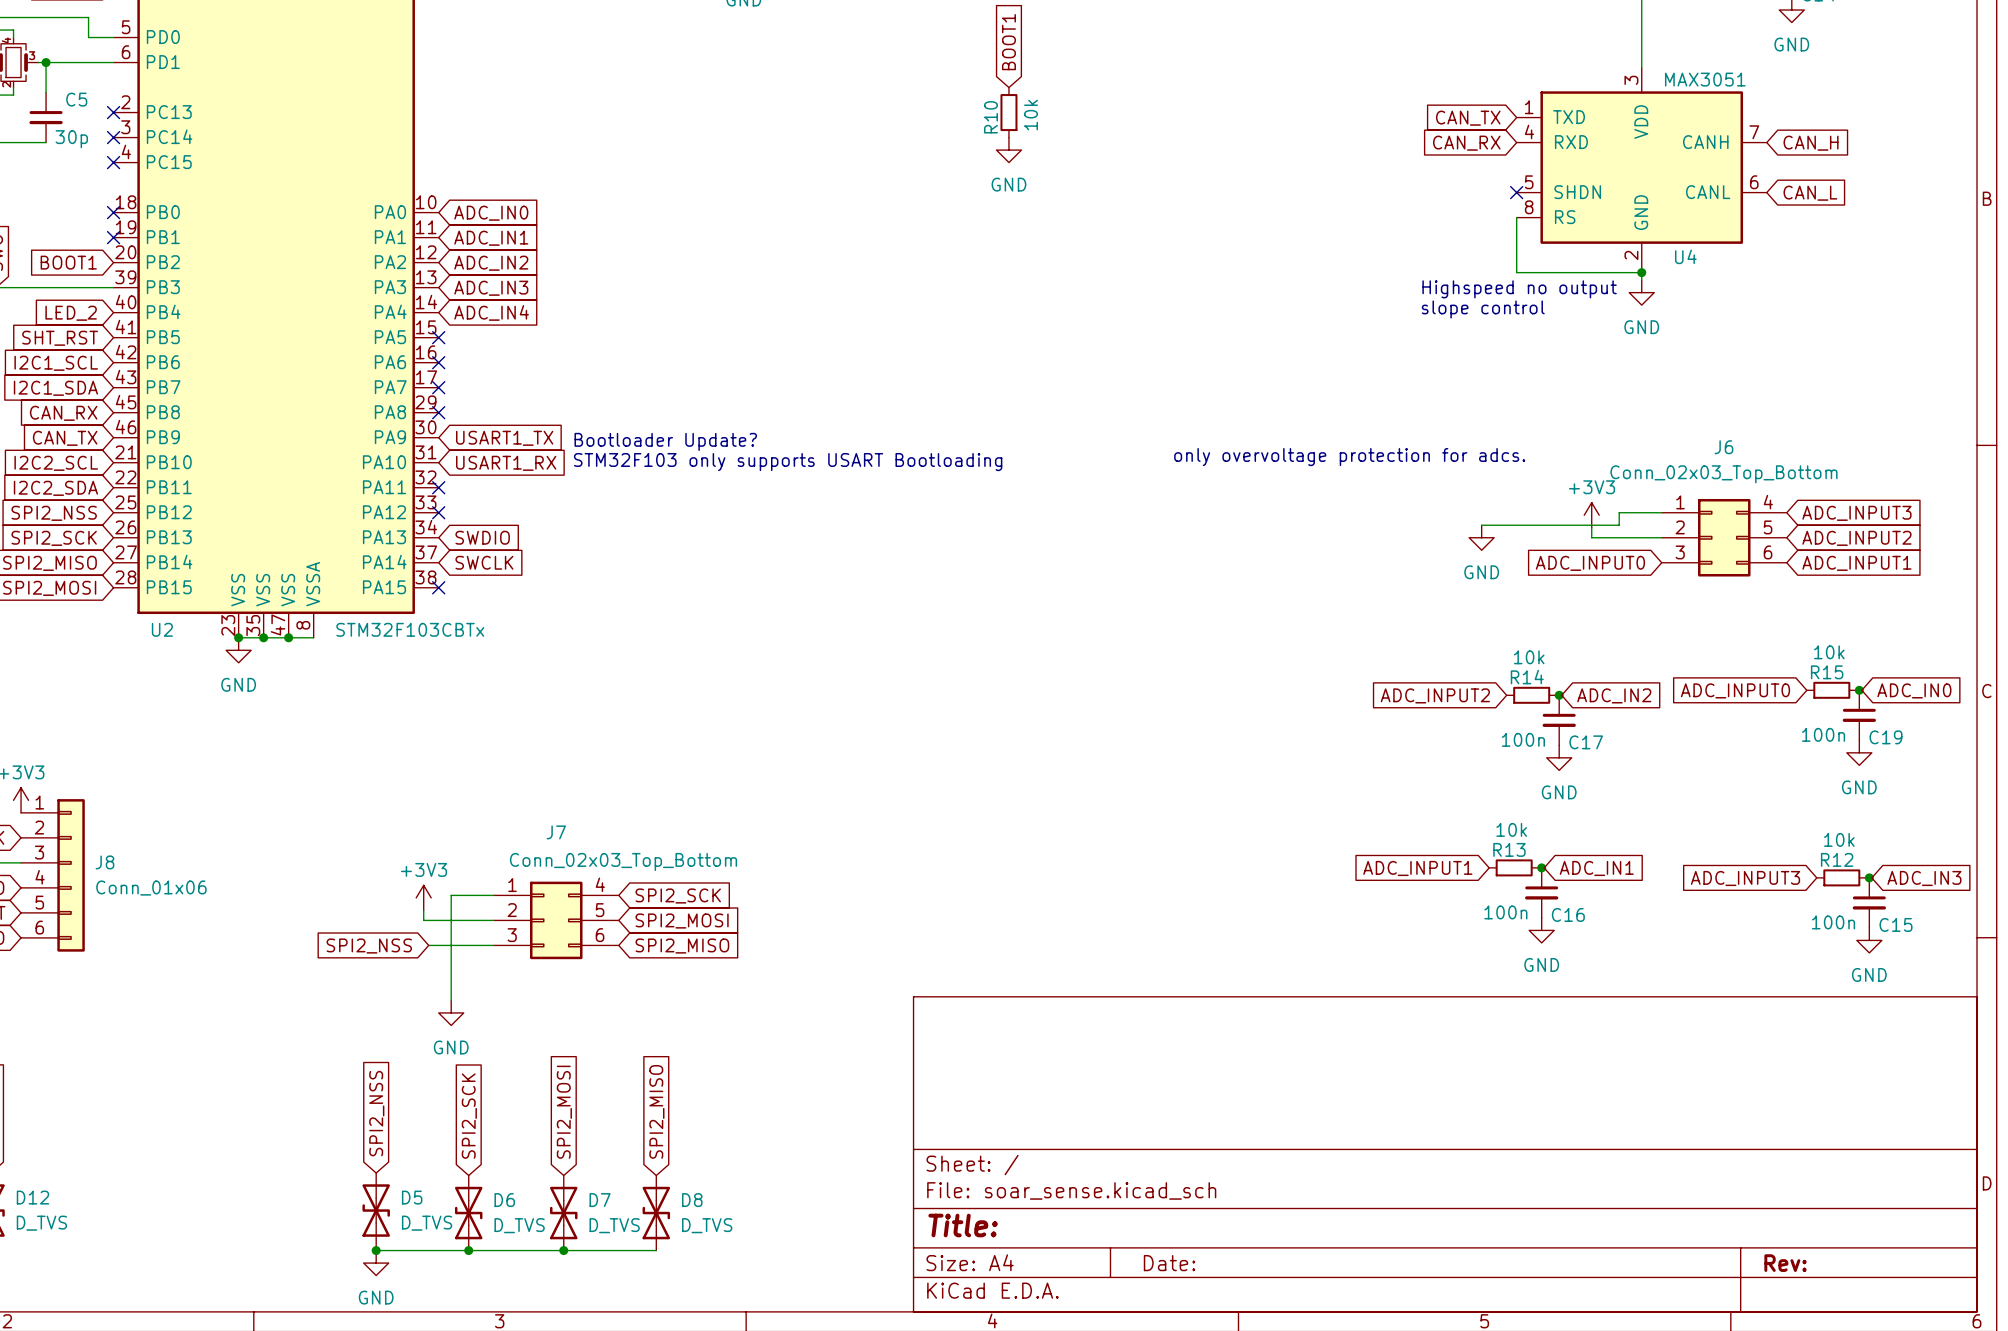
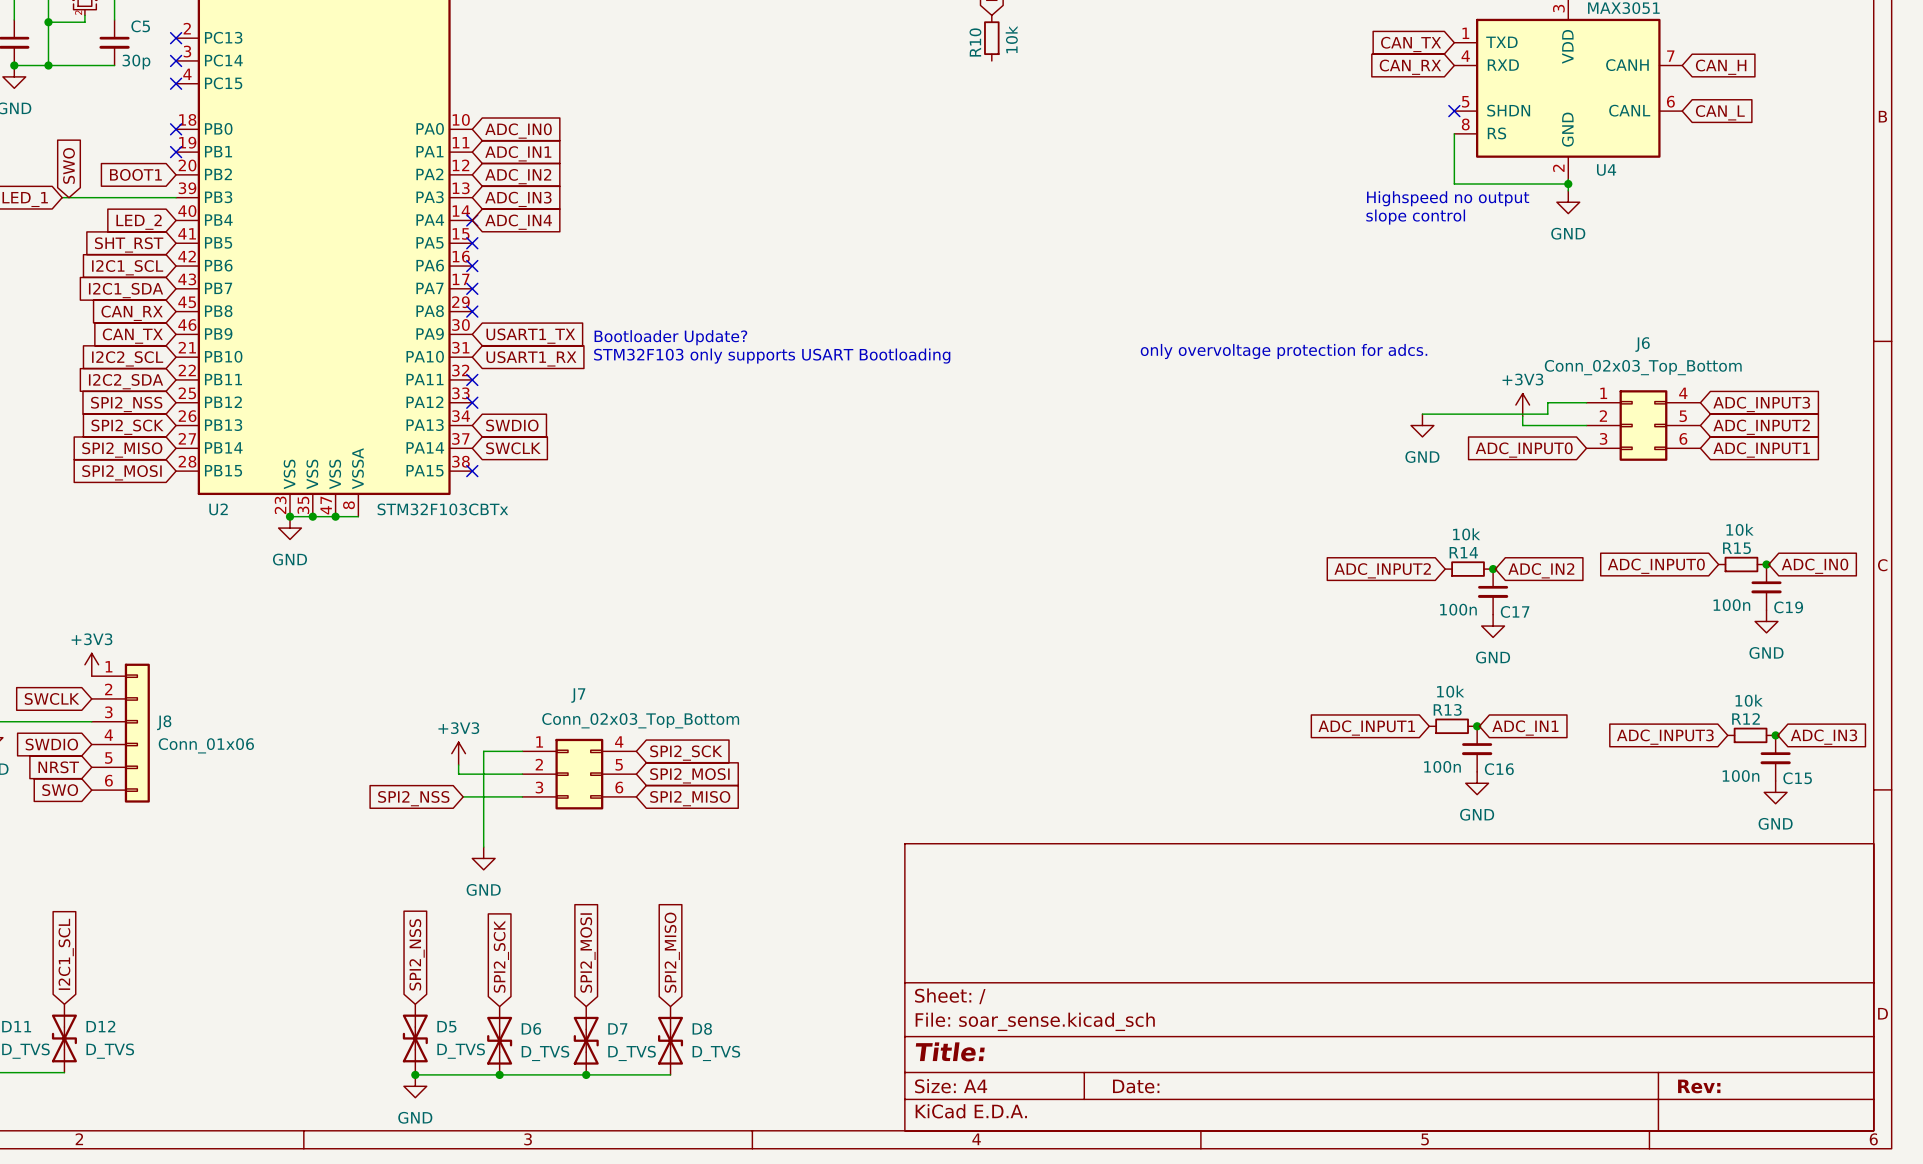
power symbol: GND (1008, 150) -> none
no-connect mark: none -> (472, 220)

